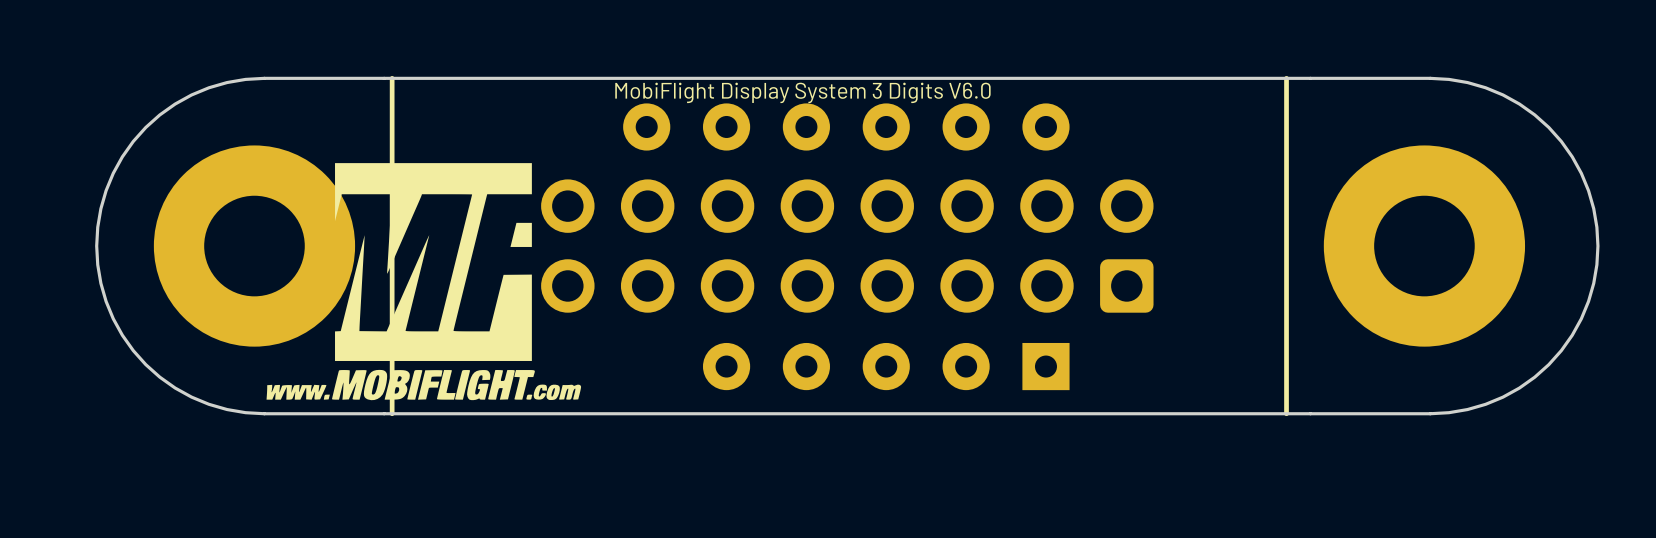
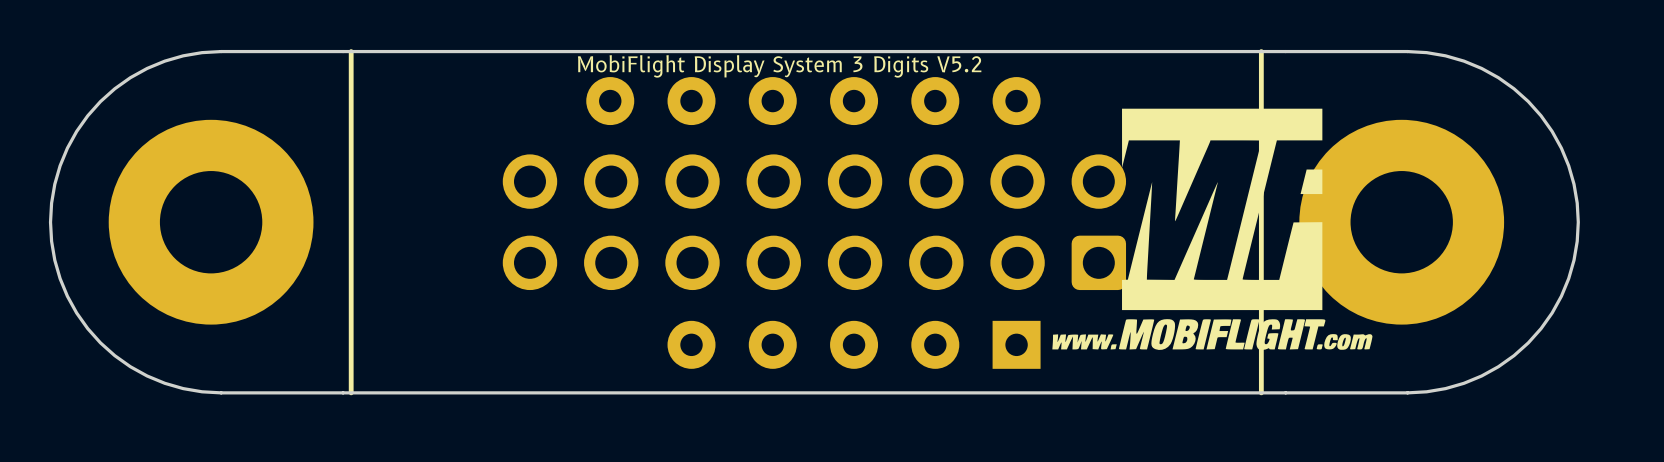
text: MobiFlight Display System 3 Digits V6.0 (802, 92) -> MobiFlight Display System 3 Digits V5.2 (779, 66)
drawing: none -> [1052, 108, 1373, 350]
drawing: [266, 163, 582, 401] -> none

